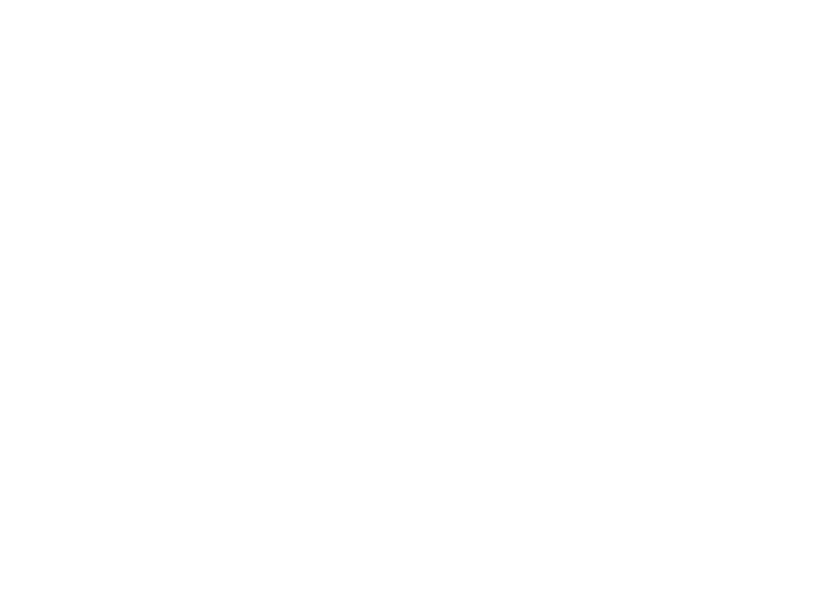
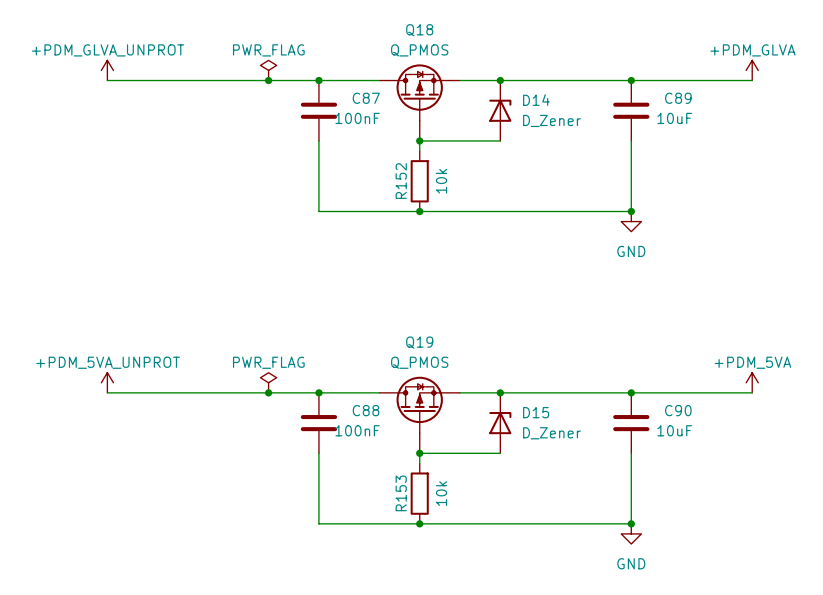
power symbol: none -> +PDM_GLVA_UNPROT (107, 70)
power symbol: none -> PWR_FLAG (268, 70)
power symbol: none -> +PDM_GLVA (752, 70)
wire: none -> (107, 80) (379, 80)
junction: none -> (268, 80)
junction: none -> (318, 80)
wire: none -> (460, 80) (752, 80)
junction: none -> (500, 80)
junction: none -> (631, 80)
Q18: none -> Q_PMOS (419, 102)
C87: none -> 100nF (318, 110)
D14: none -> D_Zener (500, 110)
C89: none -> 10uF (631, 110)
wire: none -> (318, 140) (318, 211) (631, 211) (631, 140)
junction: none -> (419, 140)
wire: none -> (500, 140) (419, 140) (419, 151)
R152: none -> 10k (419, 181)
junction: none -> (419, 211)
junction: none -> (631, 211)
power symbol: none -> GND (631, 221)
power symbol: none -> +PDM_5VA_UNPROT (107, 382)
power symbol: none -> PWR_FLAG (268, 382)
power symbol: none -> +PDM_5VA (752, 382)
wire: none -> (107, 392) (379, 392)
junction: none -> (268, 392)
junction: none -> (318, 392)
wire: none -> (460, 392) (752, 392)
junction: none -> (500, 392)
junction: none -> (631, 392)
Q19: none -> Q_PMOS (419, 415)
C88: none -> 100nF (318, 423)
D15: none -> D_Zener (500, 423)
C90: none -> 10uF (631, 423)
wire: none -> (318, 453) (318, 523) (631, 523) (631, 453)
junction: none -> (419, 453)
wire: none -> (500, 453) (419, 453) (419, 463)
R153: none -> 10k (419, 493)
junction: none -> (419, 523)
junction: none -> (631, 523)
power symbol: none -> GND (631, 533)

